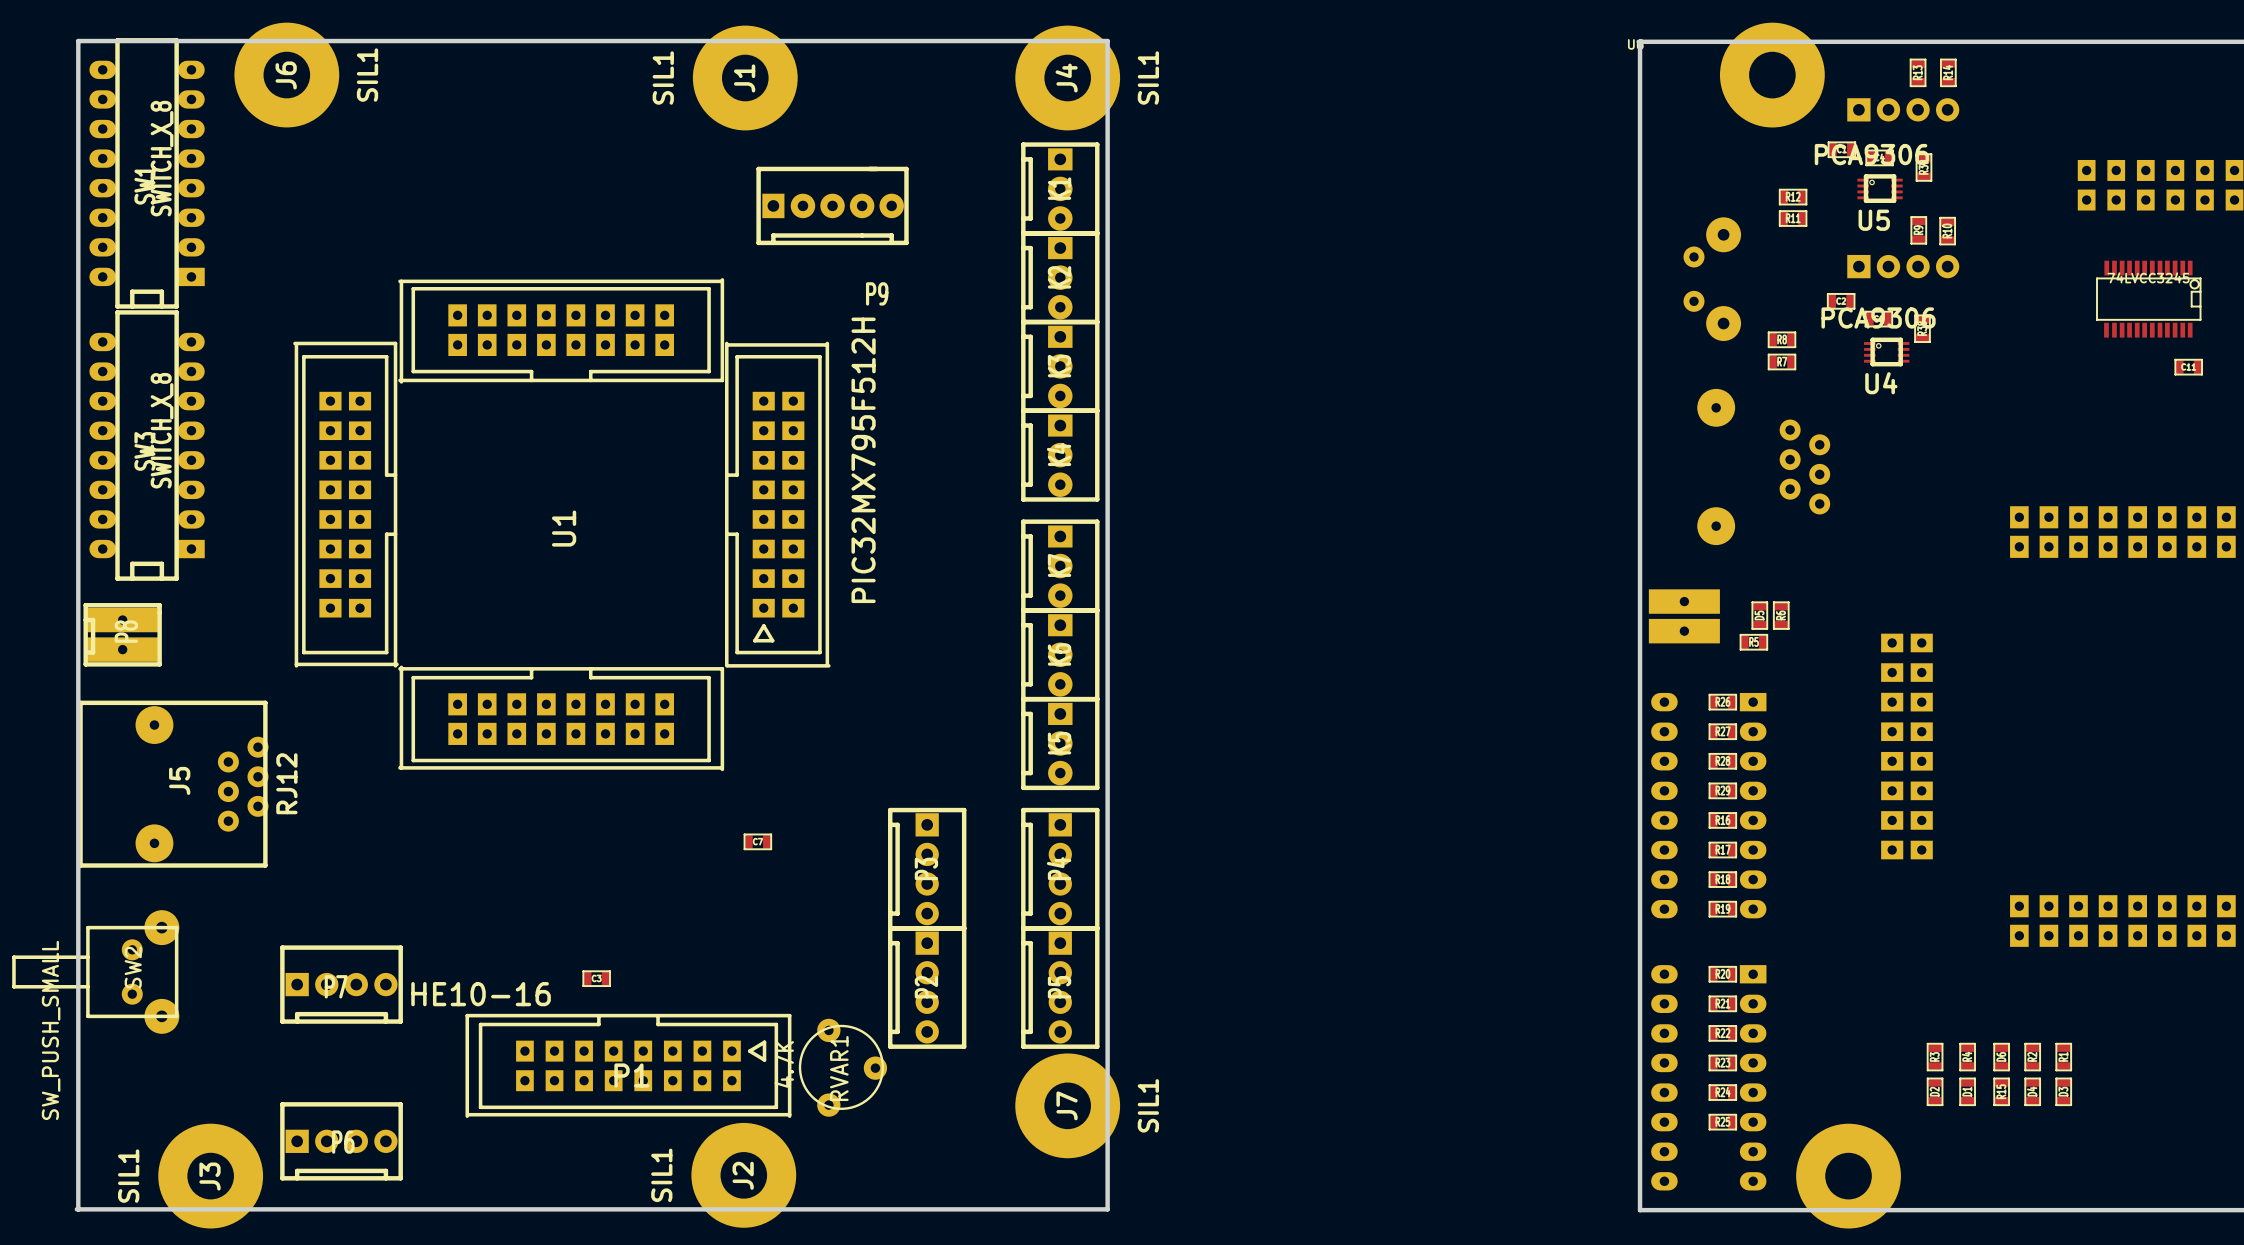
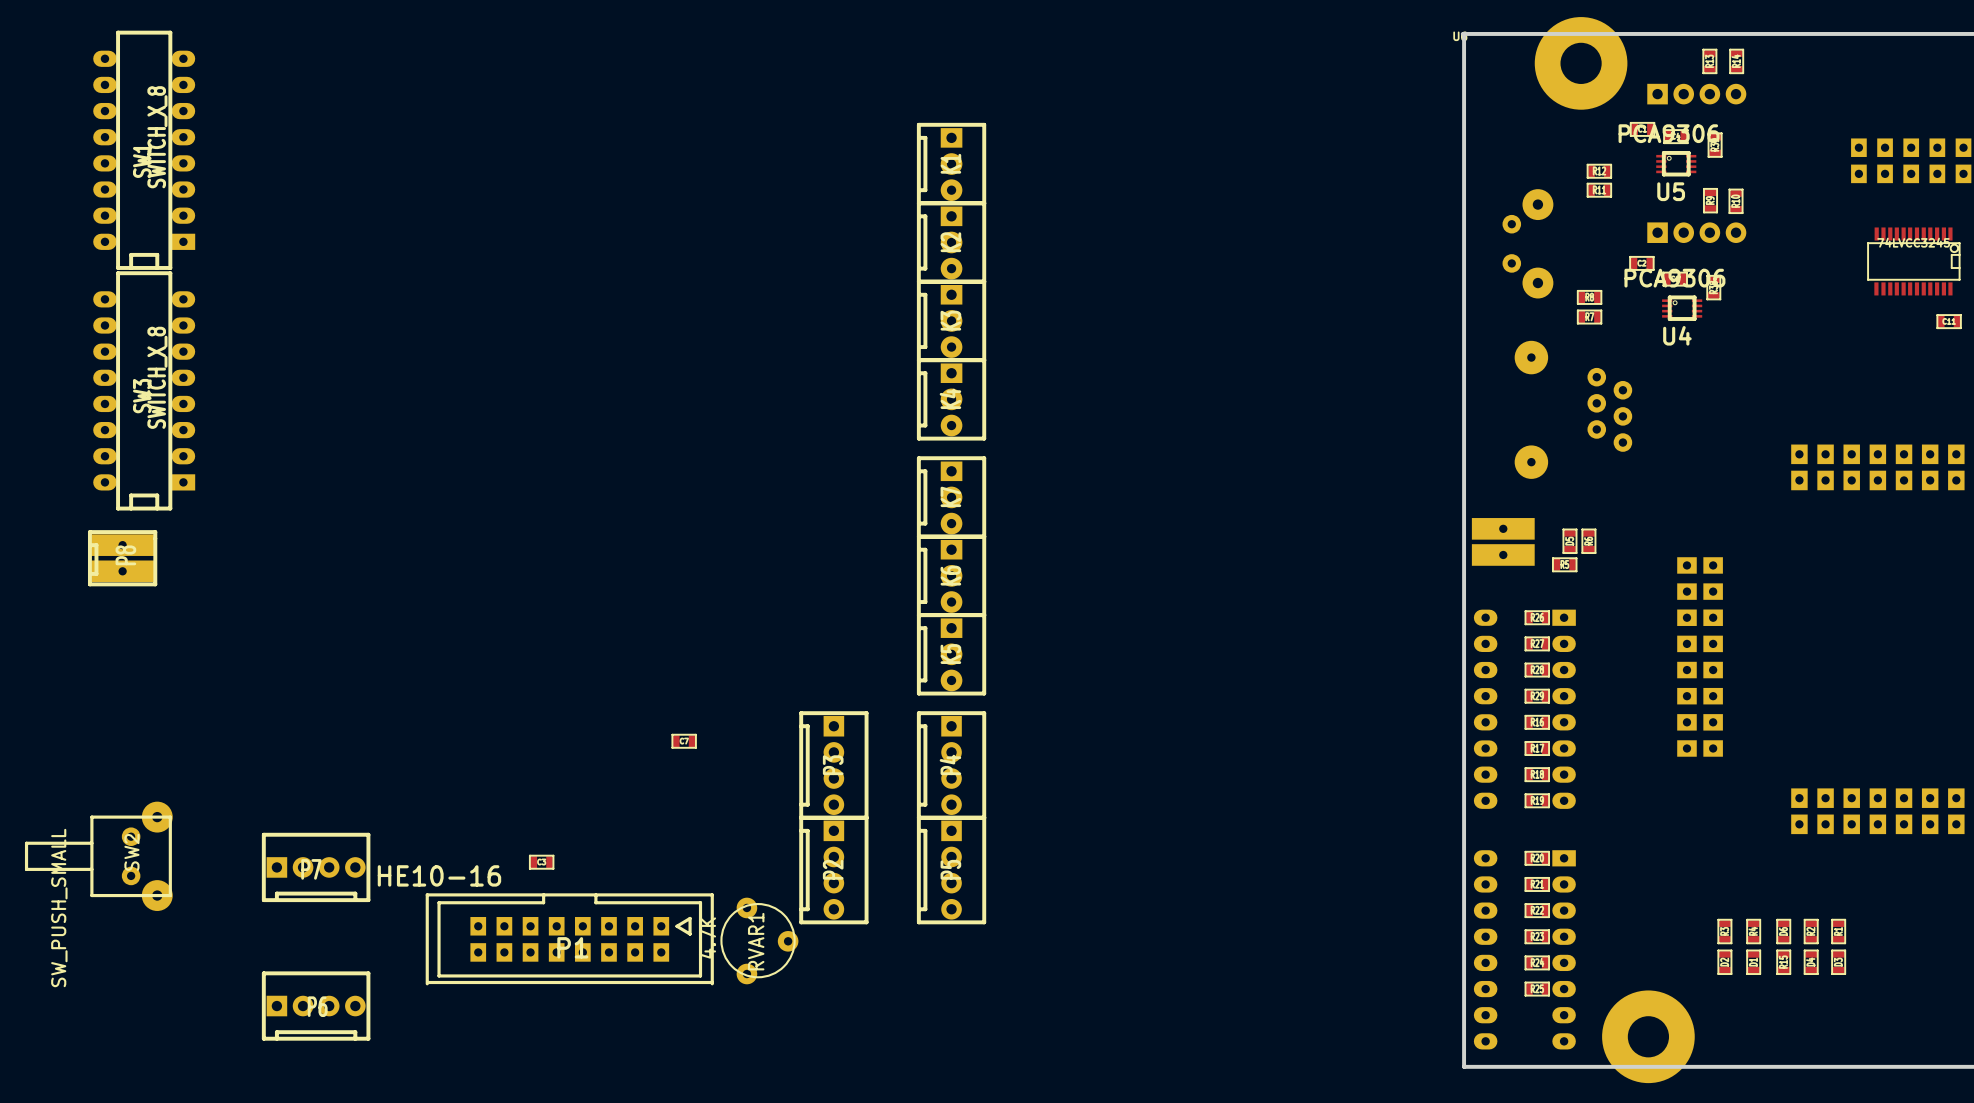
J6: SIL1 (286, 75) -> none
J1: SIL1 (745, 78) -> none
J4: SIL1 (1067, 78) -> none
P9: (832, 205) -> none
U1: PIC32MX795F512H (561, 524) -> none
J5: RJ12 (173, 784) -> none
J7: SIL1 (1067, 1105) -> none
J2: SIL1 (743, 1175) -> none
J3: SIL1 (210, 1176) -> none
board edge: (76, 1209) (1107, 1209) (1107, 41) (78, 41) (78, 1209) -> none

